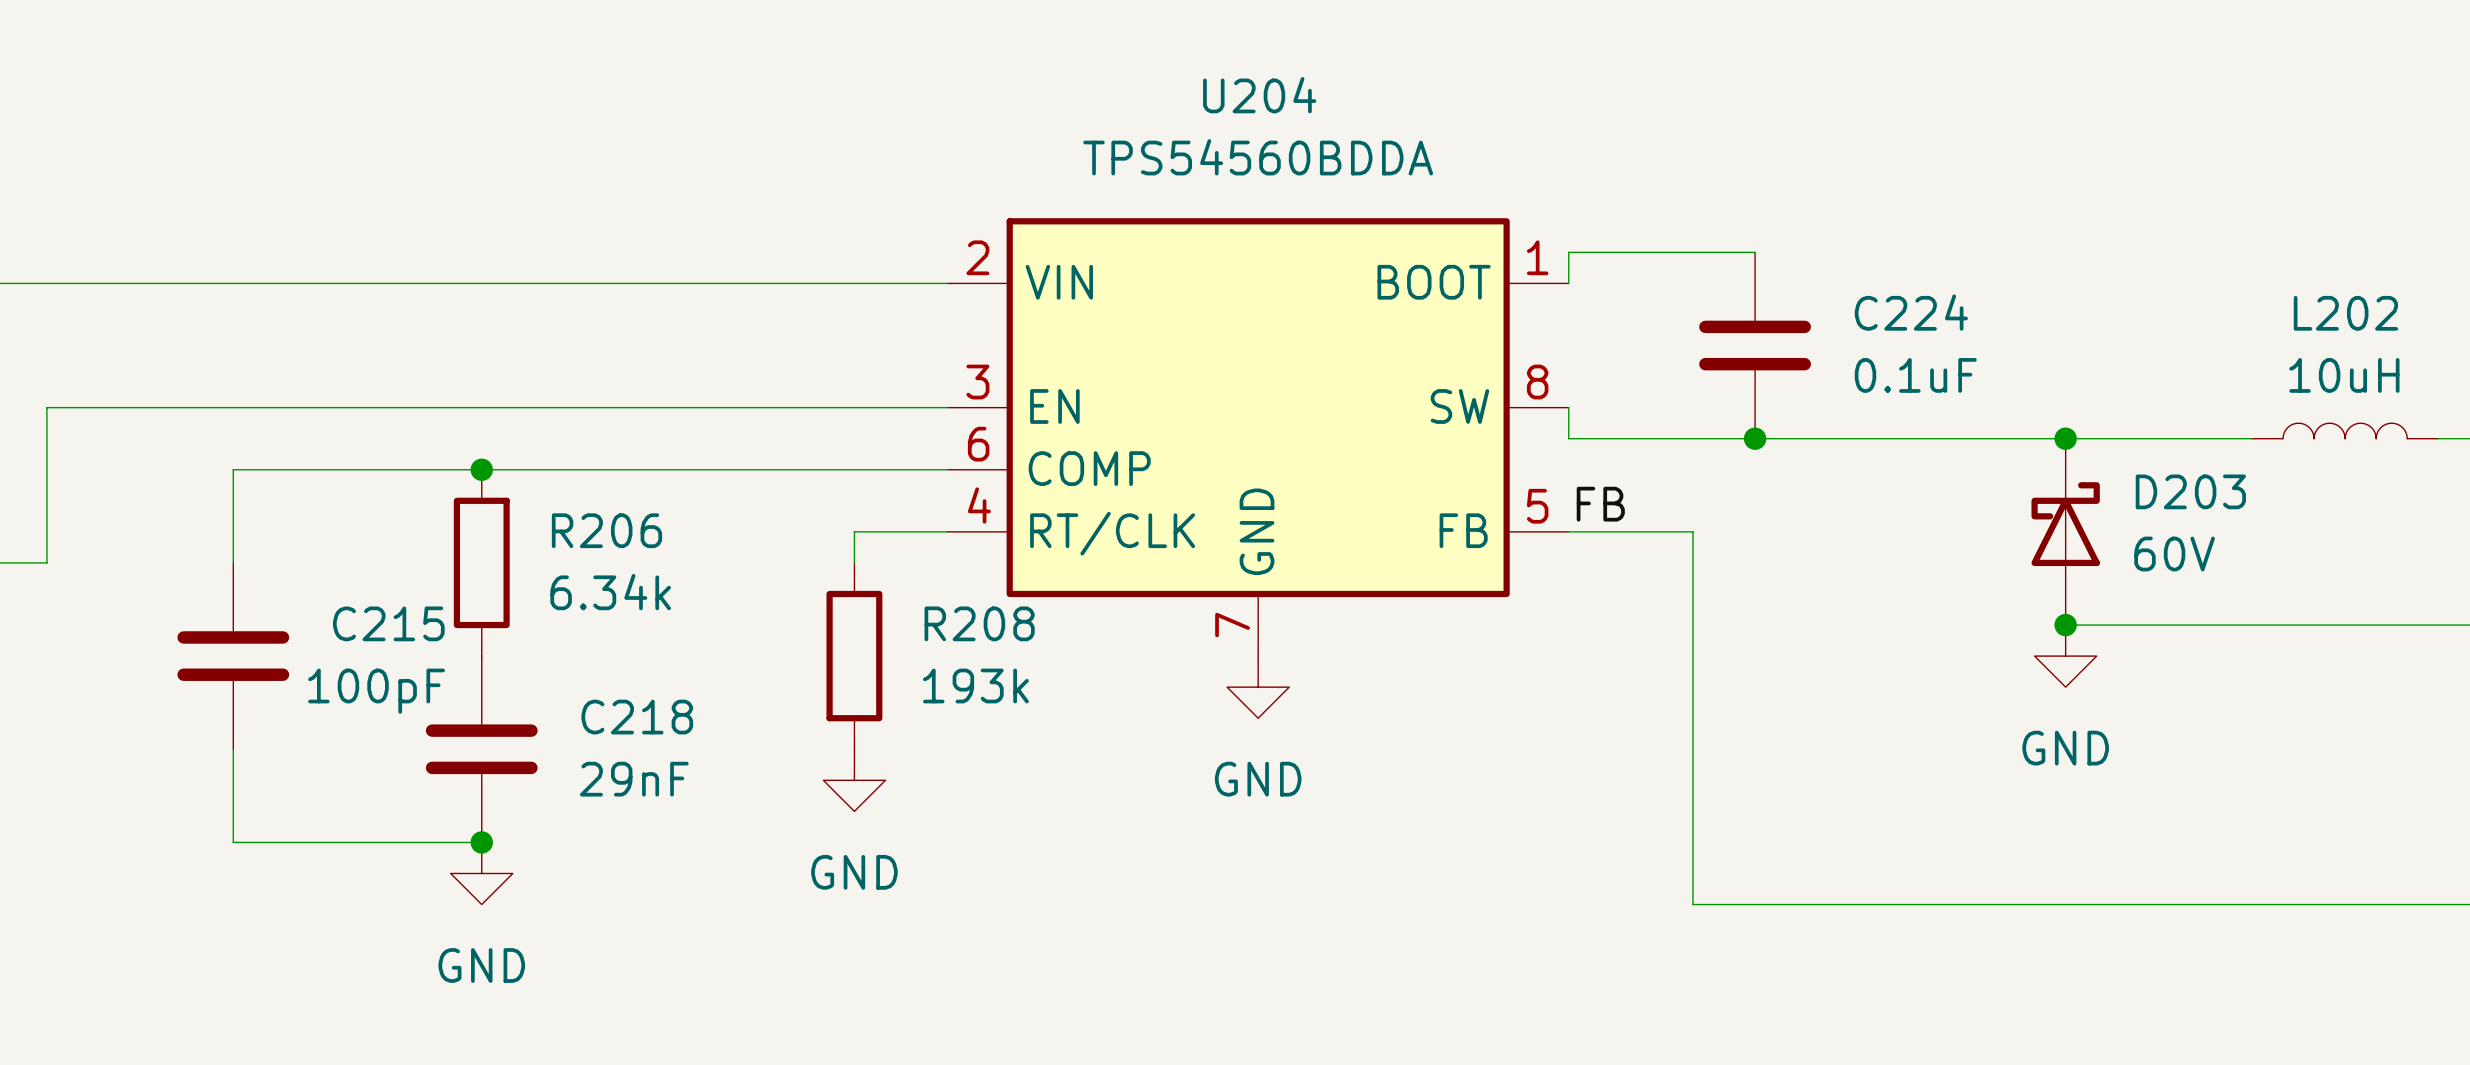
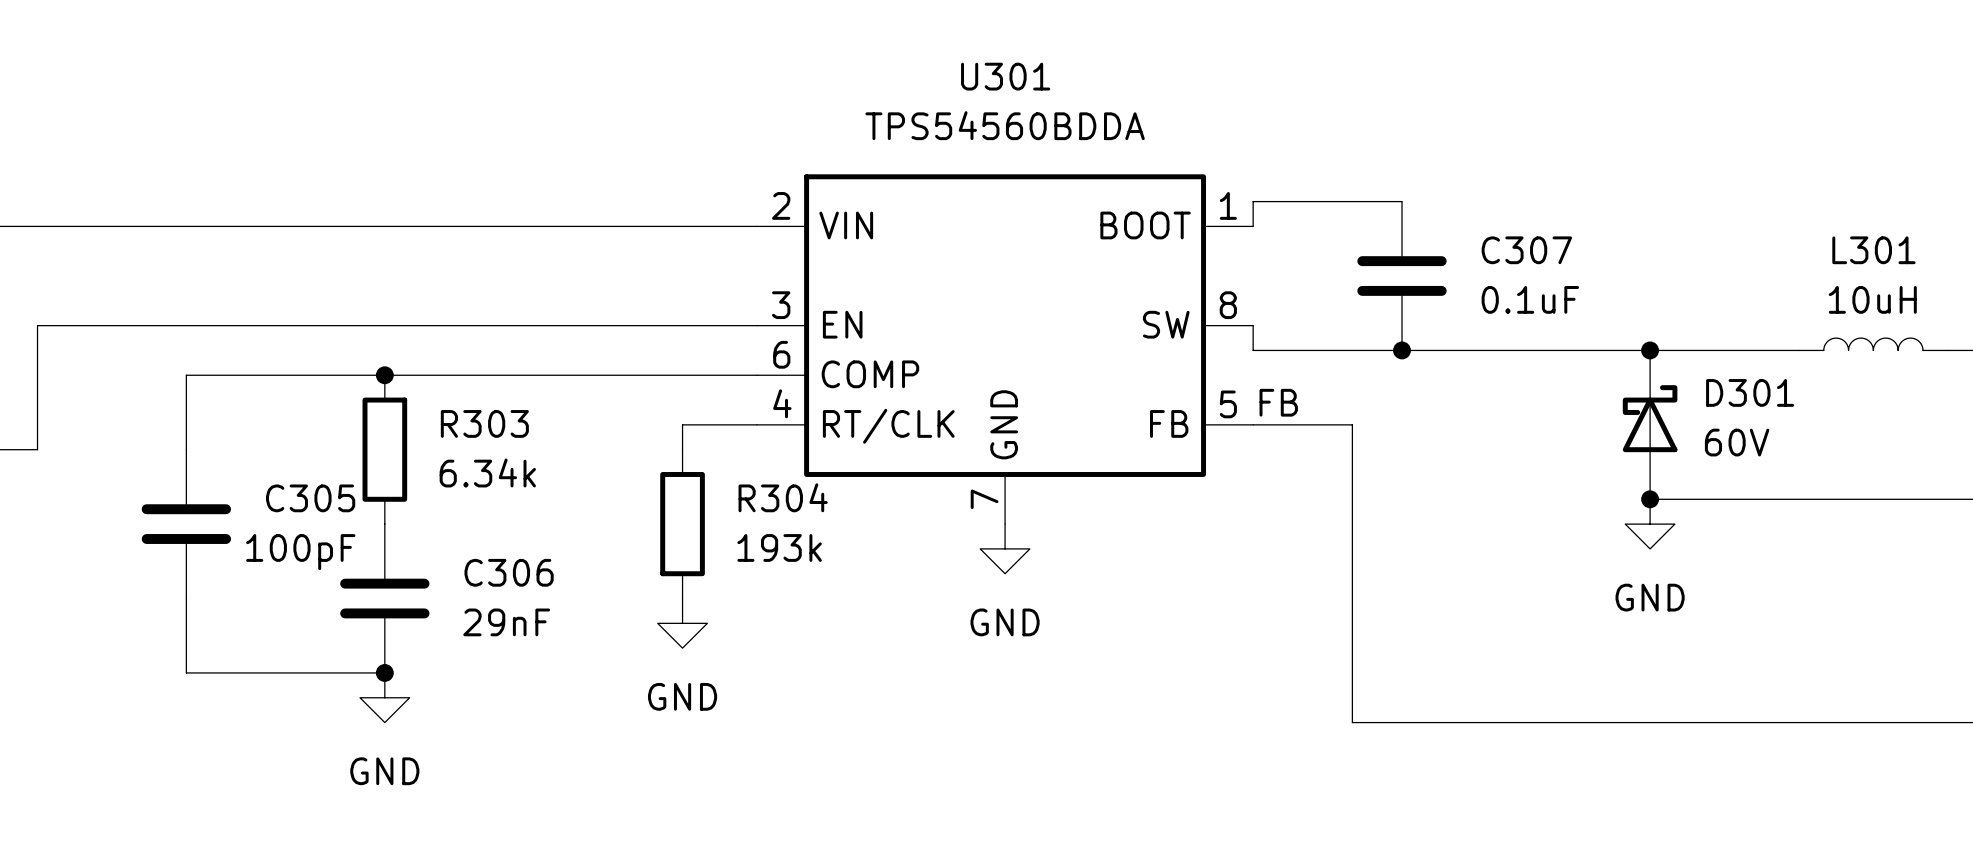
U204 name: U204 (1259, 95) -> U301 (1005, 76)
C224 name: C224 (1911, 312) -> C307 (1526, 250)
L202 name: L202 (2345, 313) -> L301 (1873, 250)
D203 name: D203 (2190, 491) -> D301 (1750, 392)
R206 name: R206 (606, 530) -> R303 (484, 423)
C215 name: C215 (388, 623) -> C305 (310, 498)
R208 name: R208 (979, 623) -> R304 (783, 497)
C218 name: C218 (637, 717) -> C306 (509, 572)

